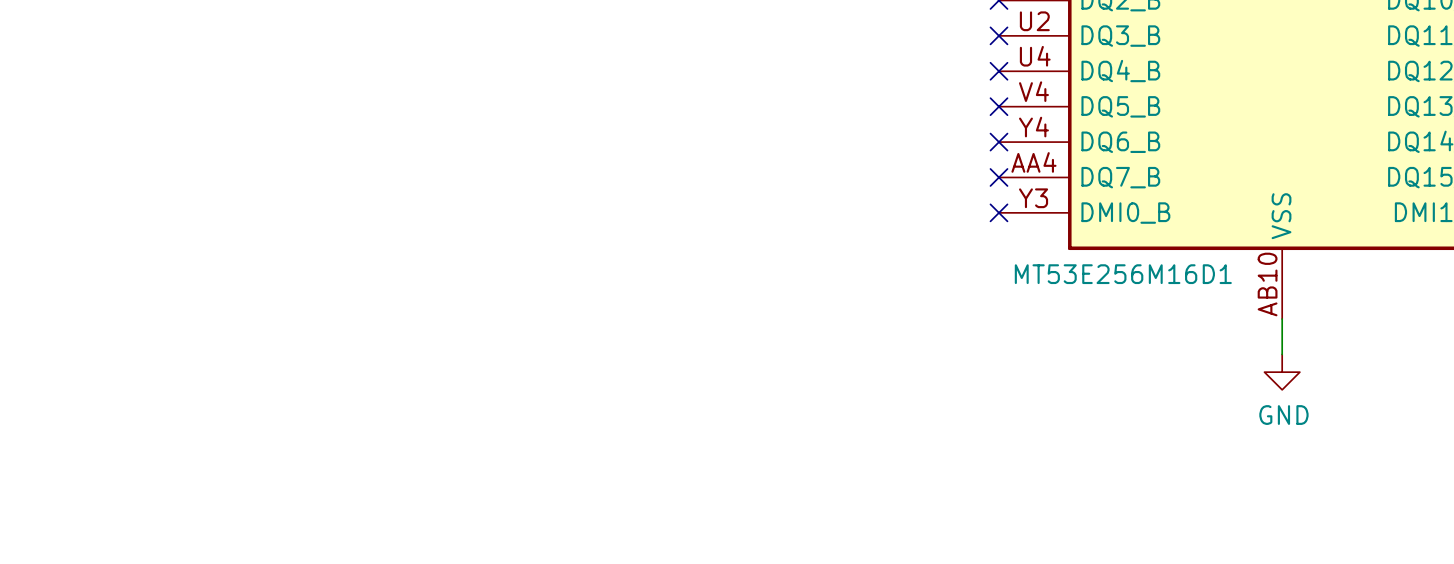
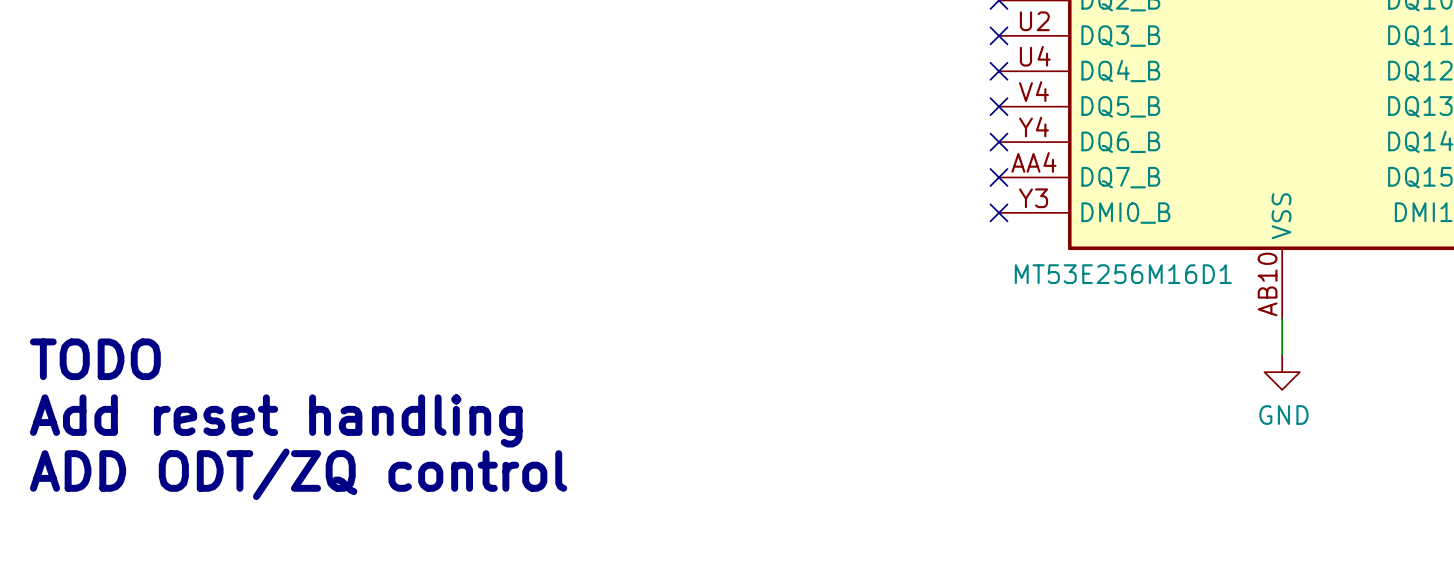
text: none -> TODO (95, 359)
text: none -> Add reset handling (276, 420)
text: none -> ADD ODT/ZQ control (298, 474)

